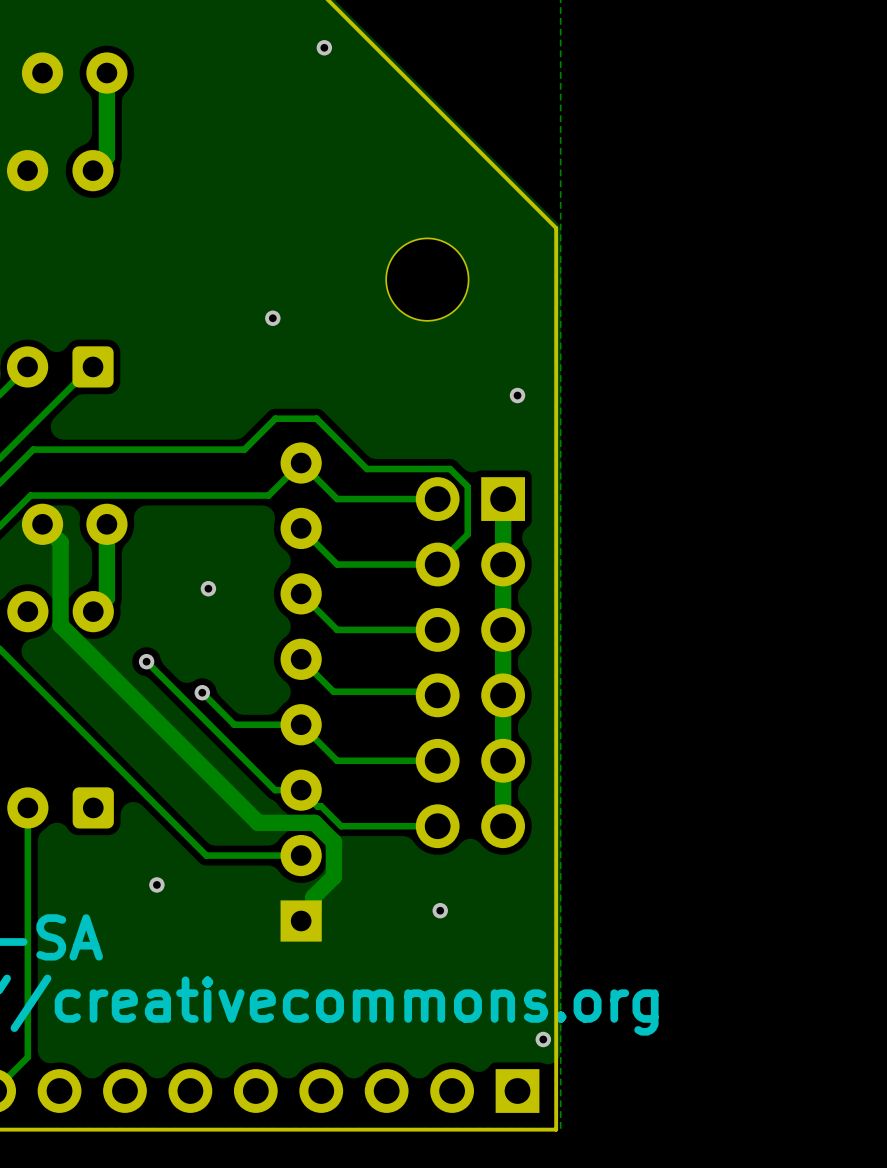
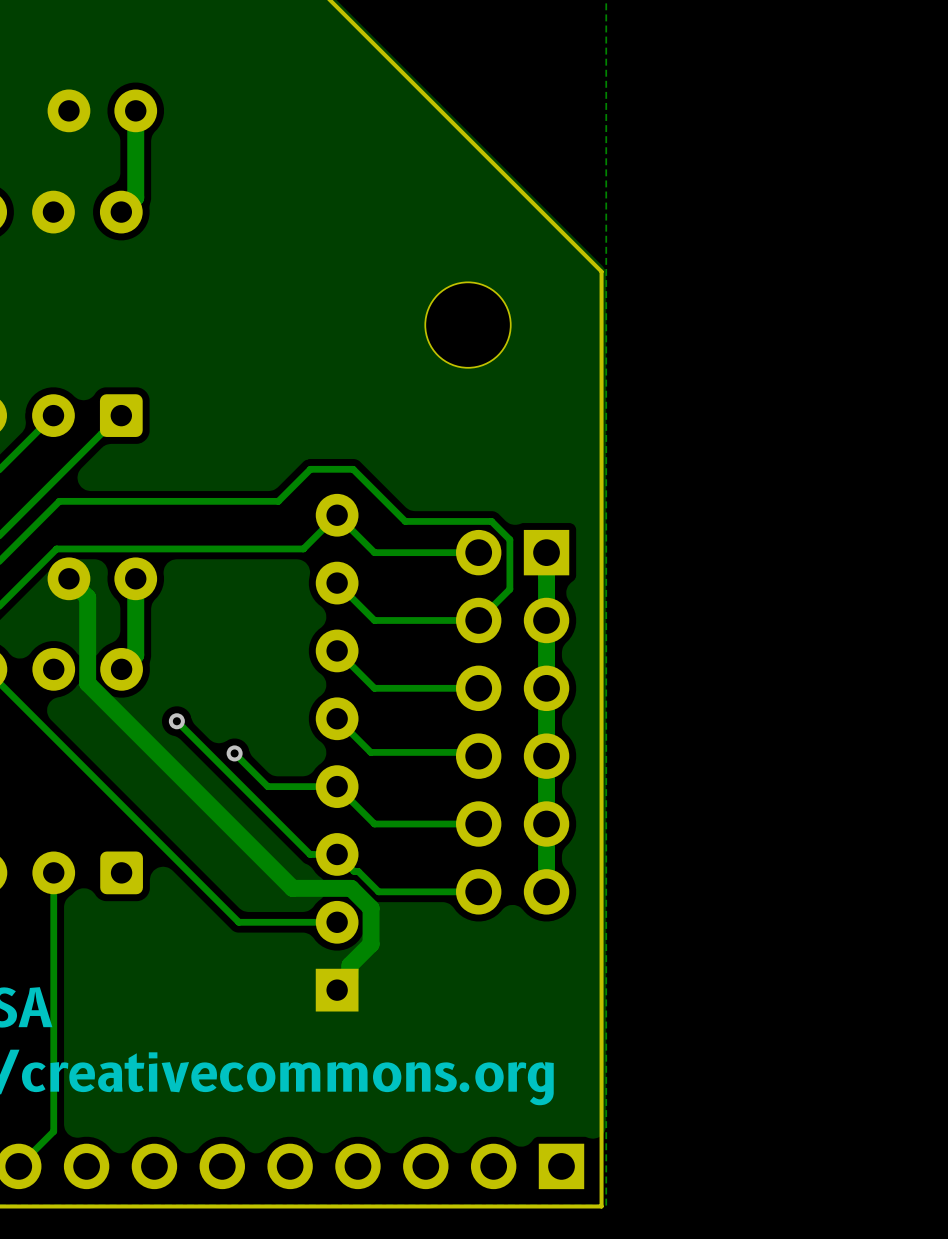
via: (324, 47) -> none
via: (272, 318) -> none
via: (517, 395) -> none
via: (208, 588) -> none
via: (156, 884) -> none
via: (440, 910) -> none
via: (543, 1039) -> none

